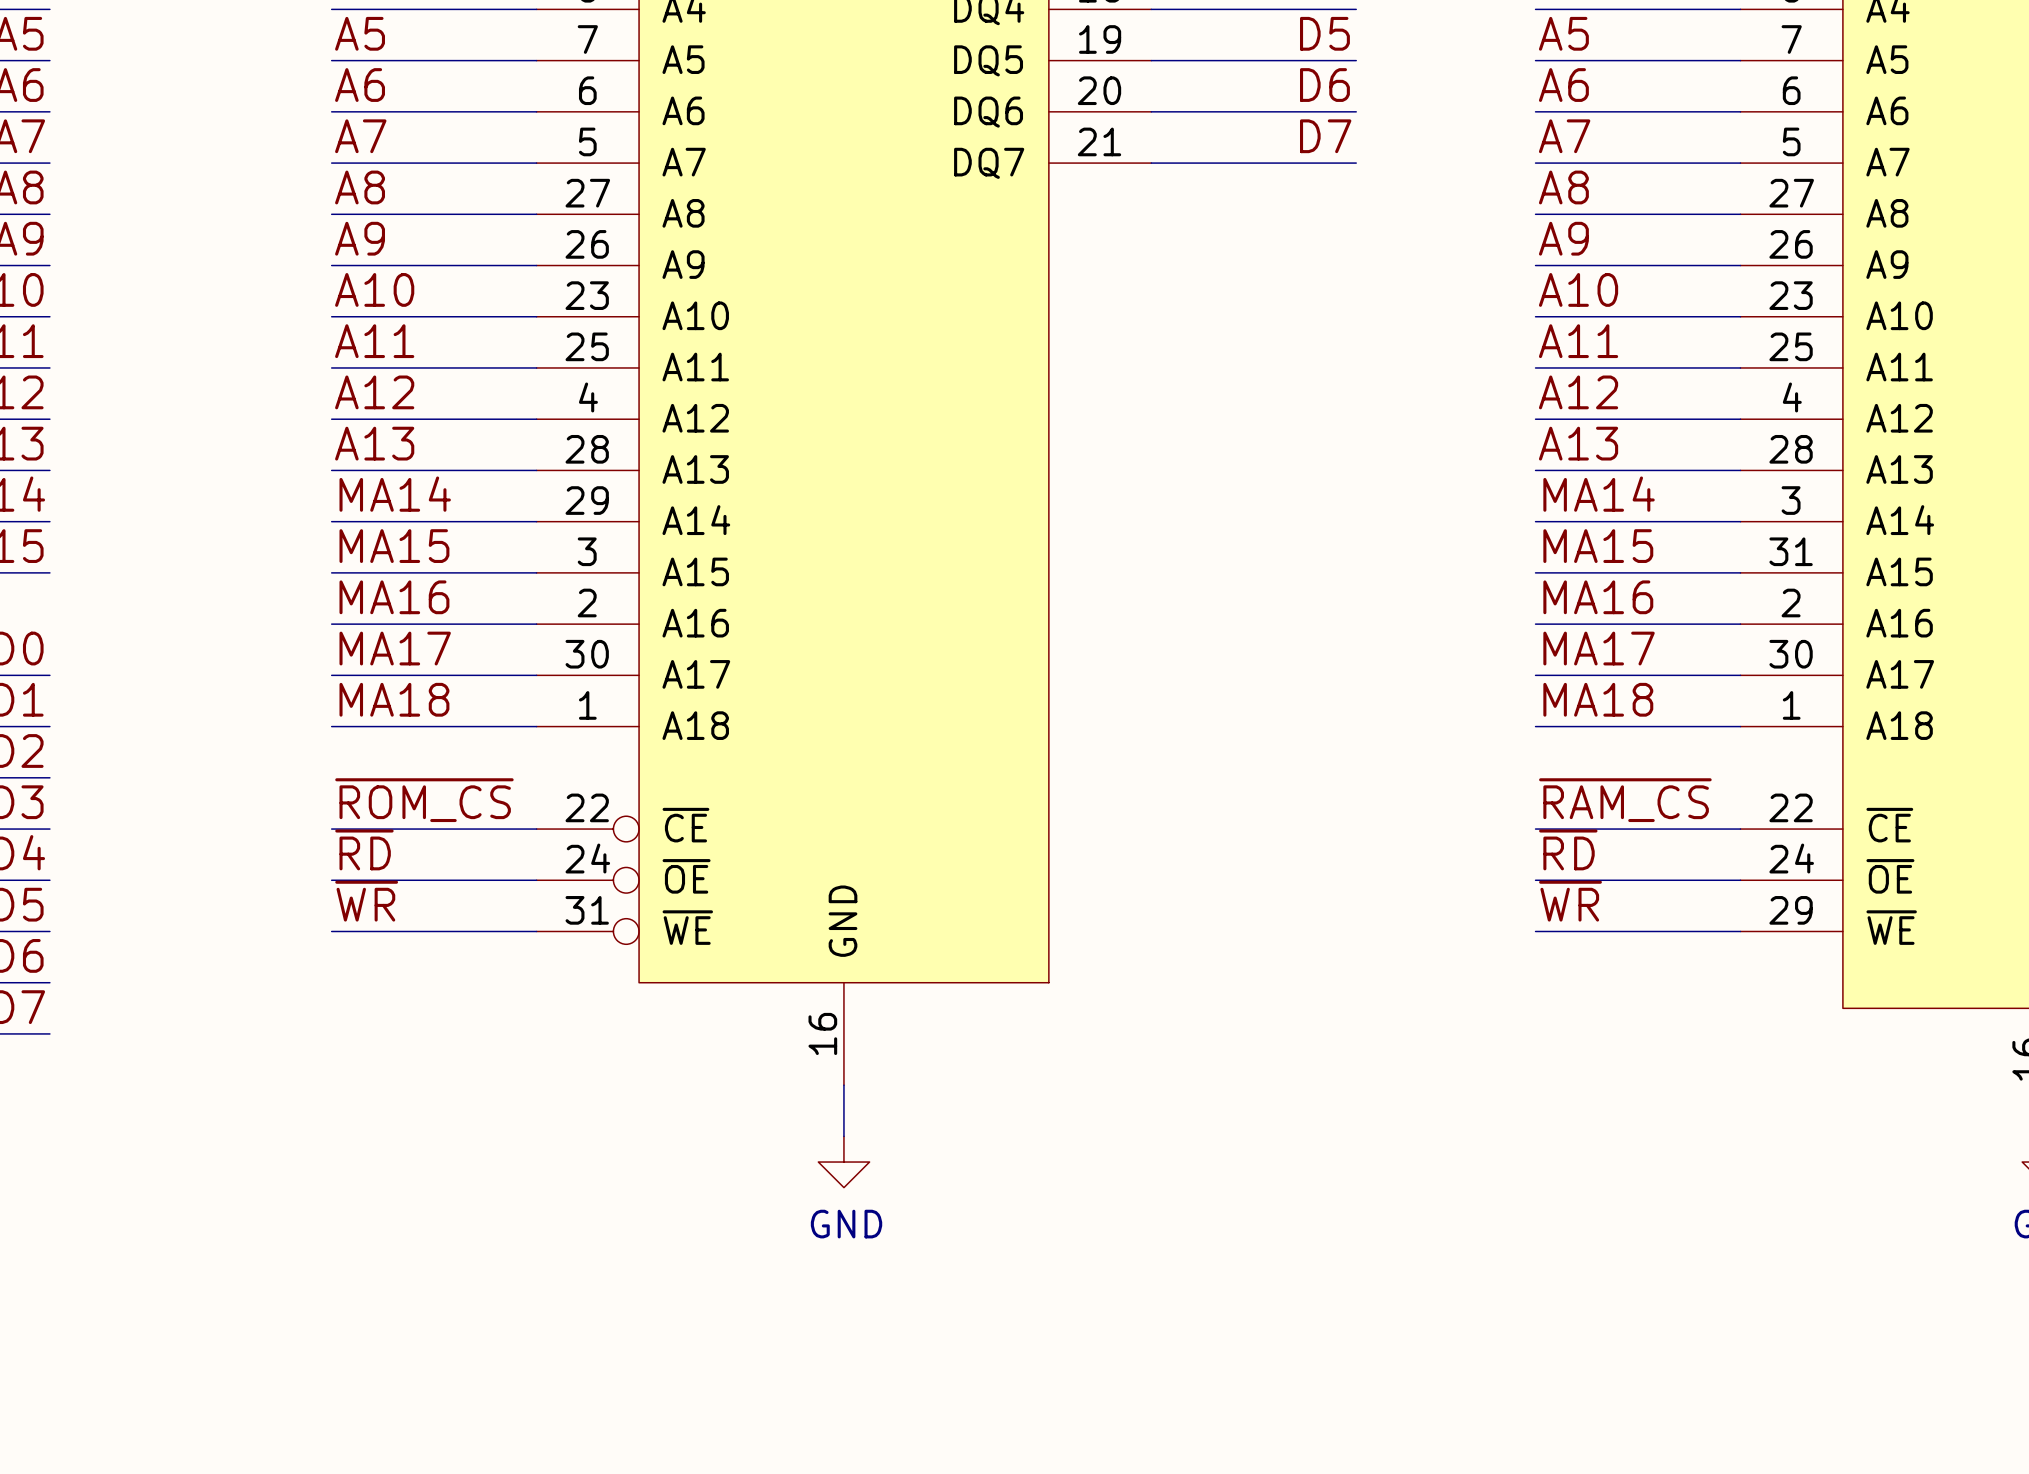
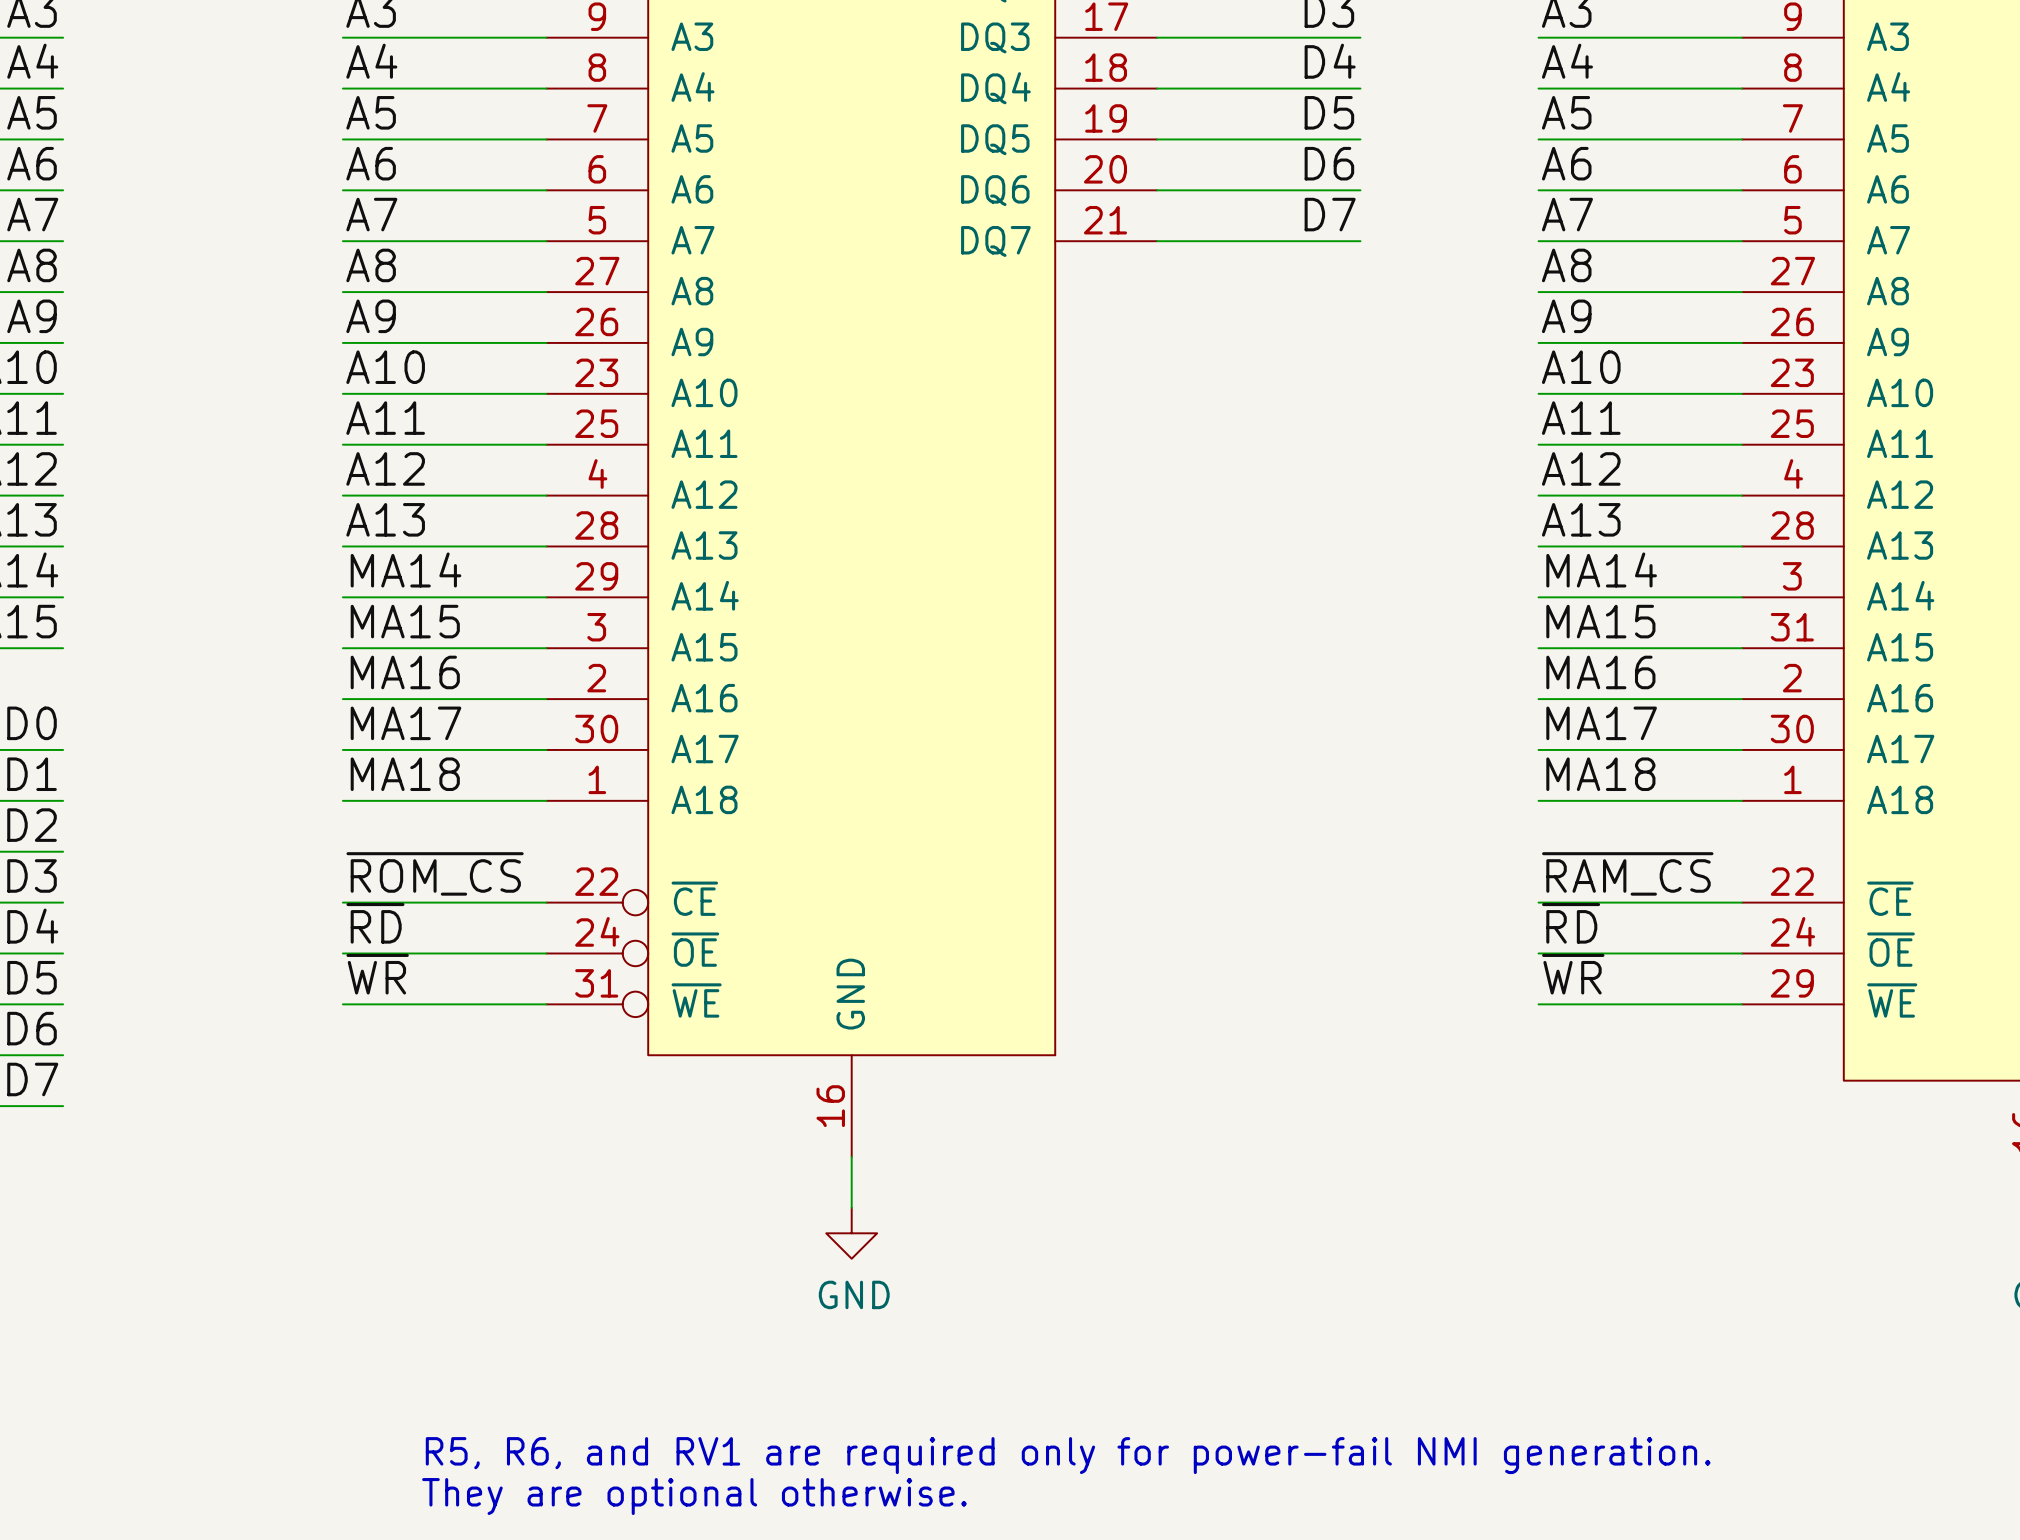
text: none -> R5, R6, and RV1 are required only for power-fail NMI generation. (1068, 1455)
text: none -> They are optional otherwise. (694, 1496)

